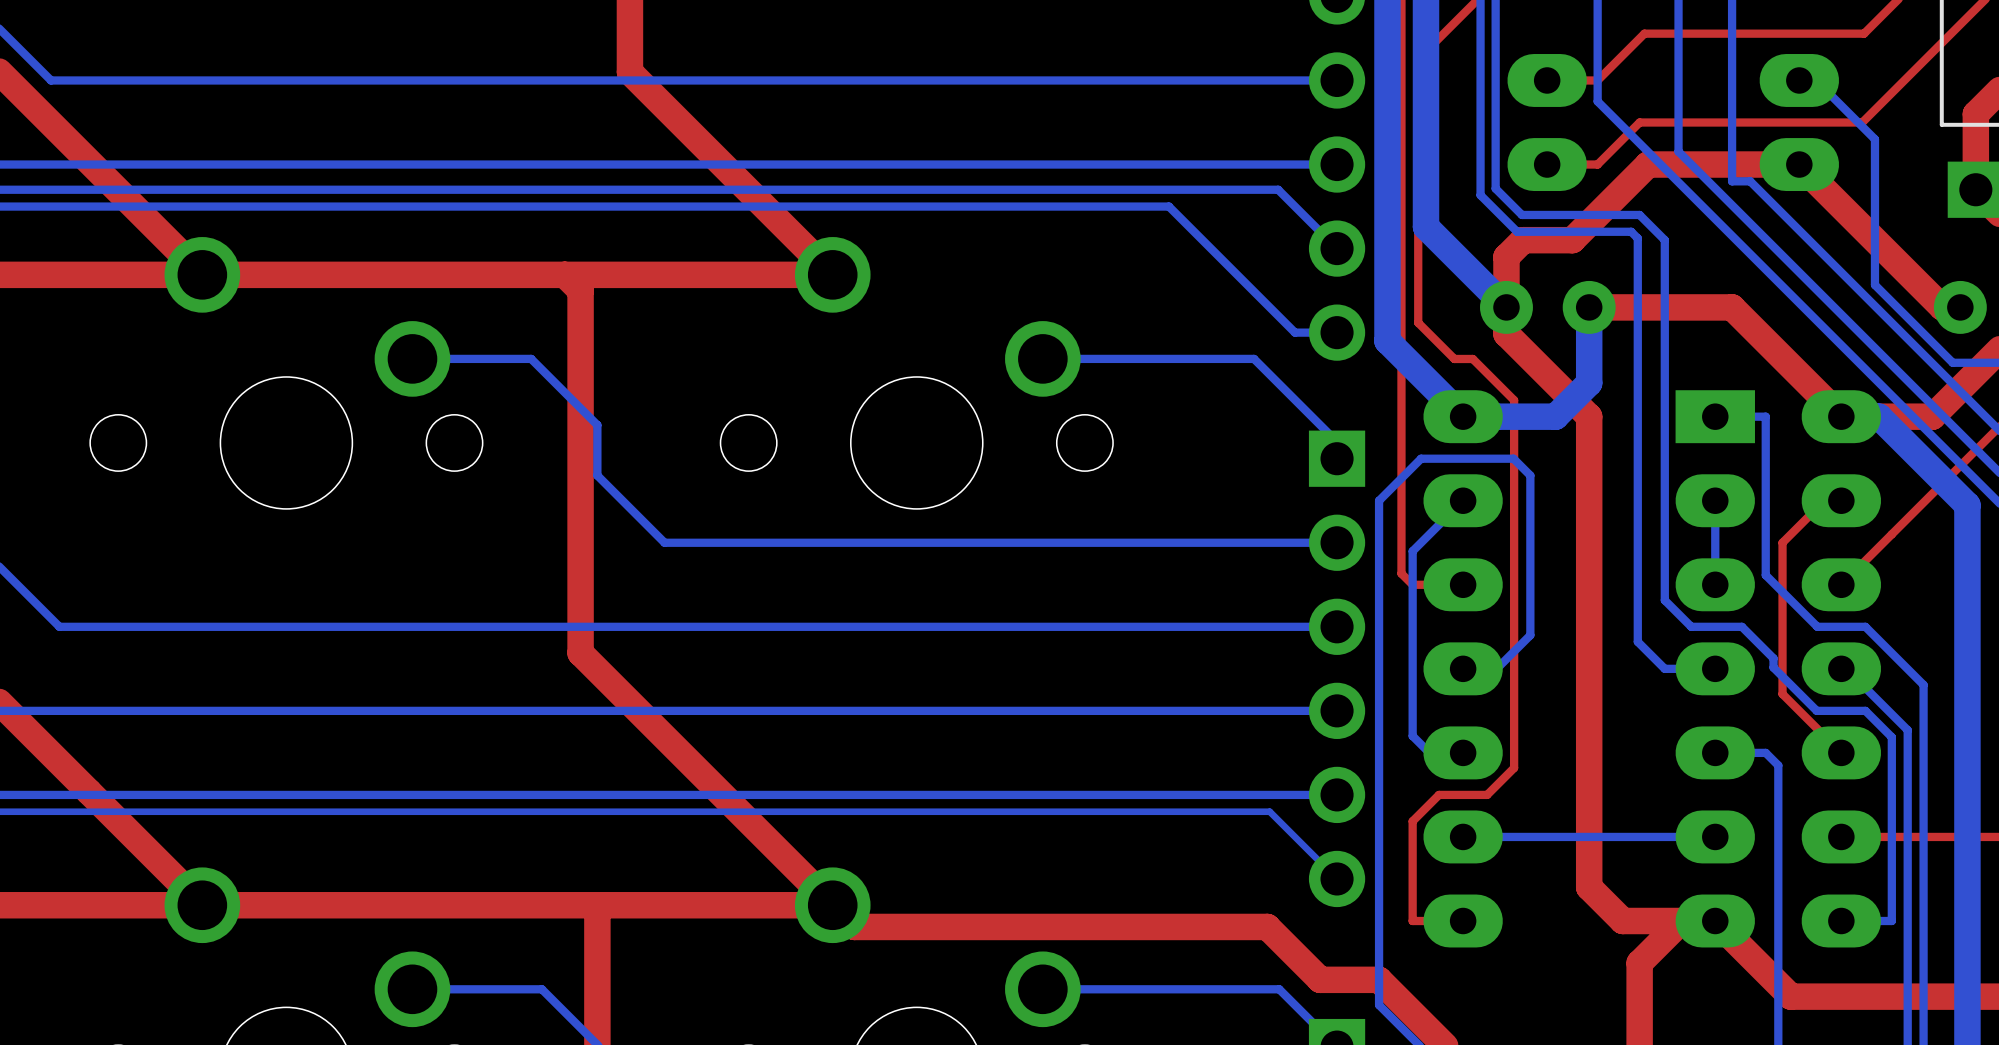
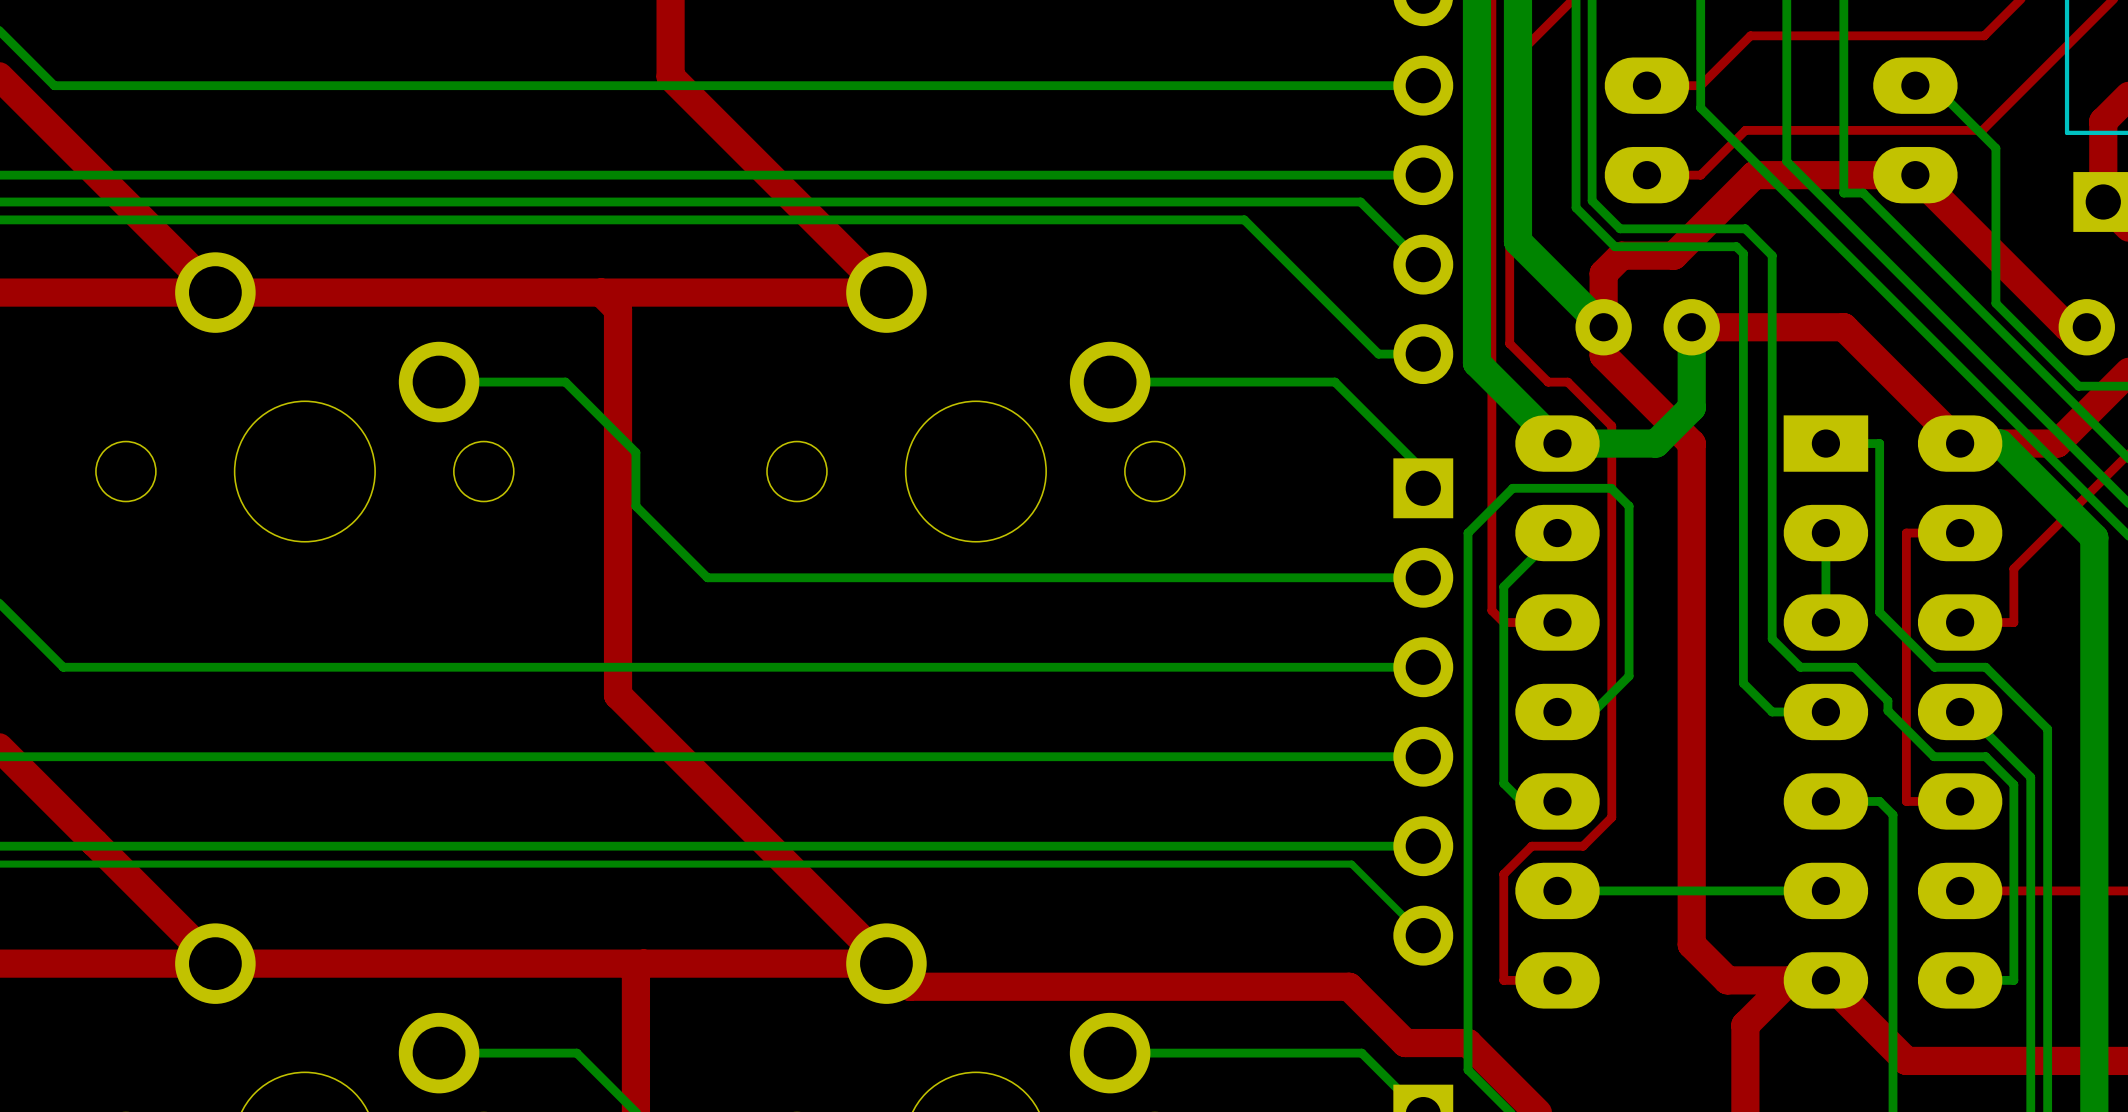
top track: (1824, 500) (1782, 542) (1782, 694) (1841, 752) -> (1942, 533) (1906, 533) (1906, 801) (1960, 801)
top track: (1891, 534) (1841, 584) -> (2013, 568) (2013, 622) (1960, 622)

